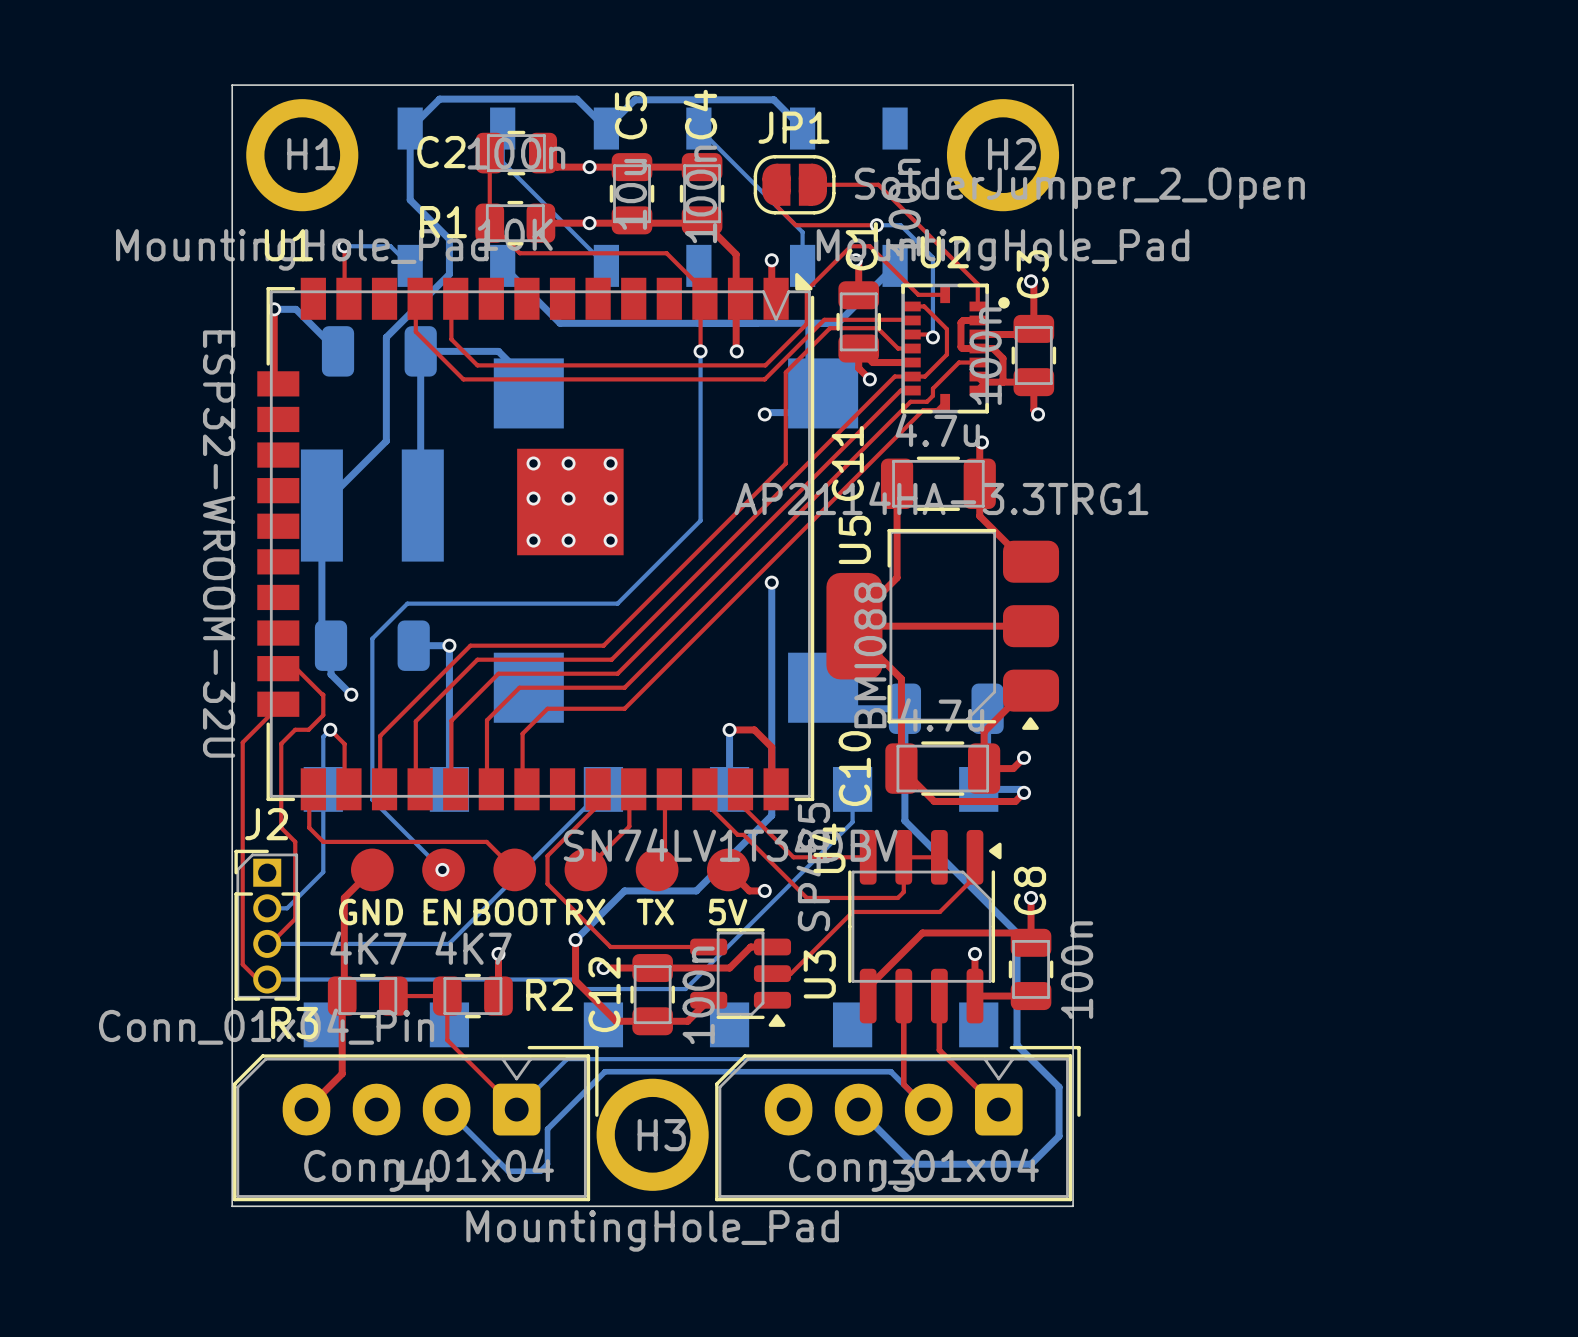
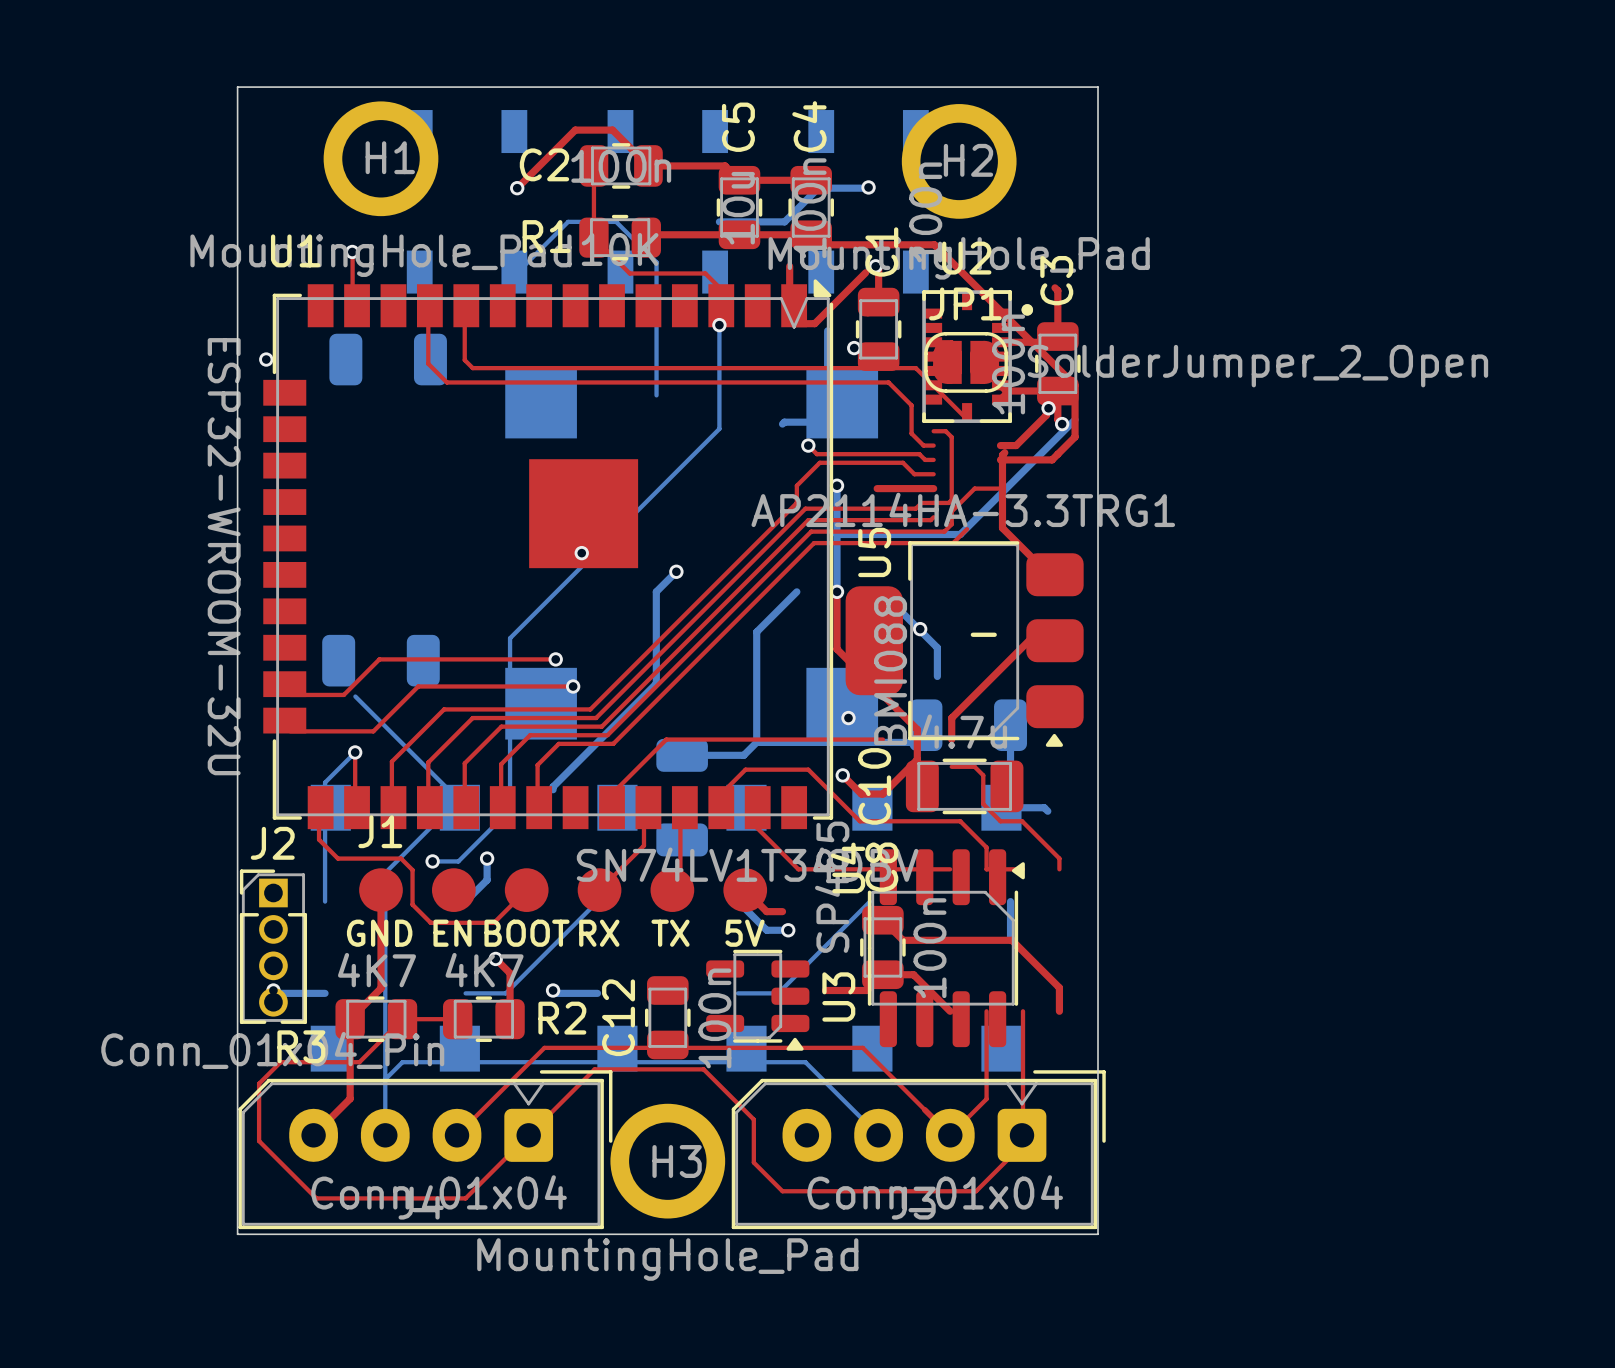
bottom track: (502, 128) (502, 162) (606, 265) -> none
bottom track: (698, 128) (802, 232) (802, 265) -> none
bottom track: (802, 128) (773, 99) (635, 99) (606, 128) (576, 99) (439, 99) (410, 128) (410, 200) (449, 239) (449, 274) (386, 337) (386, 441) (321, 505) (321, 636) (331, 645) (331, 674) (351, 694) -> none
top track: (489, 153) (489, 223) (519, 253) (666, 253) (700, 287) (700, 351) -> none
C2 position: (516, 153) -> (621, 165)
top track: (543, 153) (557, 167) (702, 167) -> none
H1 position: (302, 155) -> (380, 158)
H2 position: (1003, 155) -> (959, 161)
top track: none -> (593, 165) (593, 237) (629, 273) (705, 273) (719, 287) (719, 323)
via: (589, 167) -> none
top track: none -> (811, 180) (739, 180) (725, 165) (648, 165) (612, 130) (575, 130) (517, 188)
via: none -> (517, 188)
bottom track: none -> (868, 187) (818, 188) (784, 221) (719, 221)
top track: (776, 184) (776, 205) (795, 225) (876, 225) -> none
JP1 position: (794, 184) -> (966, 362)
top track: (812, 184) (878, 184) (977, 284) (977, 306) -> none
C5 position: (632, 193) -> (739, 207)
C4 position: (702, 193) -> (811, 207)
R1 position: (515, 223) -> (620, 237)
top track: (540, 223) (699, 223) (702, 220) (736, 254) (736, 351) -> none
via: (589, 223) -> none
bottom track: (876, 225) (900, 225) (932, 257) (932, 337) -> none
via position: (876, 225) -> (868, 187)
top track: none -> (646, 237) (649, 234) (811, 234) (821, 244) (934, 244) (1075, 385) (1075, 436) (1052, 459) (1000, 459)
bottom track: (344, 246) (390, 246) (410, 265) -> none
via: (771, 260) -> none
bottom track: (502, 265) (560, 323) (837, 323) (895, 265) -> none
bottom track: none -> (517, 272) (568, 221) (616, 221) (656, 262) (656, 395)
top track: none -> (865, 272) (814, 323) (792, 323)
via: (1031, 281) -> none
top track: (945, 294) (918, 294) (869, 246) (850, 246) (806, 290) (806, 324) (765, 365) (477, 365) (451, 339) (451, 305) -> none
top track: (415, 305) (415, 331) (463, 379) (764, 379) (824, 319) (912, 320) -> none
top track: (912, 306) (924, 306) (946, 329) (946, 354) (924, 376) (894, 376) (611, 659) (477, 659) (415, 721) (415, 782) -> none
top track: (274, 309) (274, 377) (280, 383) -> none
bottom track: (274, 309) (295, 309) (338, 351) -> none
via position: (274, 309) -> (266, 359)
top track: none -> (428, 323) (428, 363) (446, 382) (888, 382) (911, 405) (911, 433) (923, 445) (933, 445)
top track: none -> (464, 323) (464, 360) (472, 368) (915, 368) (967, 419)
bottom track: none -> (719, 325) (719, 428) (510, 638) (510, 809) (458, 861) (432, 861)
via: none -> (719, 325)
top track: (977, 320) (963, 320) (960, 322) (960, 346) (993, 348) (1003, 358) (1003, 382) -> none
via: (932, 337) -> none
via: none -> (854, 348)
top track: (912, 348) (898, 348) (877, 328) (829, 328) (785, 372) (785, 463) (603, 645) (470, 645) (380, 735) (380, 782) -> none
bottom track: (700, 351) (700, 520) (617, 603) (407, 603) (372, 638) (372, 799) (442, 869) -> none
via: (700, 351) -> none
via: (736, 351) -> none
top track: (912, 362) (872, 362) (858, 348) (858, 368) (869, 379) -> none
top track: (977, 362) (959, 362) (932, 388) (932, 395) (927, 401) (910, 401) (792, 519) -> (1000, 488) (974, 488) (951, 511) (951, 524) (944, 531) (811, 531)
via: (869, 379) -> none
top track: (912, 390) (900, 390) (617, 673) (498, 673) (451, 720) (451, 782) -> none
top track: none -> (1048, 408) (1046, 408) (1046, 415) (1016, 445) (1000, 445)
via: none -> (1048, 408)
top track: (945, 402) (937, 410) (923, 410) (624, 708) (547, 708) (522, 733) (522, 782) -> none
bottom track: none -> (1075, 419) (960, 534) (837, 534)
bottom track: (528, 412) (528, 381) (498, 351) (420, 351) (420, 503) (422, 505) -> none
via position: (764, 414) -> (808, 445)
top track: none -> (933, 431) (945, 431) (951, 437) (951, 500) (948, 502) (921, 502) (915, 508) (805, 508) (596, 718) (472, 718) (428, 762) (428, 811)
top track: none -> (808, 445) (816, 454) (919, 454) (925, 459) (933, 459)
via: (981, 442) -> none
via: (533, 463) -> none
via: (568, 463) -> none
via: (610, 463) -> none
top track: none -> (933, 474) (914, 474) (902, 462) (819, 462) (796, 485) (796, 502) (590, 709) (444, 709) (391, 761) (391, 811)
bottom track: none -> (837, 485) (837, 591)
via: none -> (837, 485)
top track: none -> (877, 488) (933, 488)
top track: (897, 483) (897, 577) (848, 626) -> none
C11 side: top (938, 483) -> bottom (682, 797)
via: (533, 498) -> none
via: (568, 498) -> none
via: (610, 498) -> none
part: (372, 505) -> none
top track: none -> (933, 517) (930, 520) (808, 520) (601, 726) (501, 726) (464, 763) (464, 811)
top track: none -> (967, 529) (953, 543) (814, 543) (613, 743) (558, 743) (537, 765) (537, 811)
via: (533, 540) -> none
via: (610, 540) -> none
bottom track: none -> (676, 571) (656, 591) (656, 683) (553, 786) (553, 789)
via: none -> (676, 571)
bottom track: none -> (796, 591) (756, 632) (756, 742)
top track: none -> (837, 591) (837, 649) (917, 729) (917, 759) (882, 794) (861, 794) (842, 775)
bottom track: none -> (881, 591) (937, 647) (937, 676)
bottom track: (771, 582) (771, 815) (696, 890) (624, 890) (575, 939) -> none
via position: (771, 582) -> (837, 591)
via: none -> (920, 629)
top track: none -> (1040, 629) (951, 718) (951, 739)
text: none -> - (983, 634)
top track: (848, 626) (901, 678) (901, 768) (934, 801) (1015, 801) (1024, 792) -> none
top track: (848, 626) (1025, 626) -> none
top track: none -> (555, 659) (379, 659) (343, 694) (290, 694)
via: none -> (555, 659)
bottom track: (413, 645) (449, 645) (449, 789) -> none
via: (449, 645) -> none
top track: (280, 668) (296, 668) (323, 694) (323, 715) (308, 729) (295, 729) (281, 743) (281, 827) (295, 841) (295, 918) (270, 943) (267, 943) -> none
top track: none -> (573, 686) (418, 686) (373, 731) (290, 731)
via: none -> (573, 686)
bottom track: none -> (355, 696) (448, 789) (468, 789) (385, 872) (385, 1135)
top track: (624, 687) (519, 687) (486, 720) (486, 782) -> (639, 703) (607, 735) (530, 735) (501, 764) (501, 811)
top track: (1025, 690) (984, 731) (984, 768) (1013, 768) (1024, 757) -> none
via: (351, 694) -> none
via: none -> (848, 718)
top track: (280, 704) (242, 742) (242, 964) (257, 979) (267, 979) -> none
bottom track: (823, 706) (824, 708) (904, 708) (904, 820) (1017, 932) (1017, 1045) (1059, 1087) (1059, 1136) (1031, 1164) (913, 1164) (858, 1109) -> (385, 1079) (402, 1062) (805, 1062) (878, 1135)
top track: none -> (882, 739) (666, 739) (610, 795) (610, 811)
bottom track: none -> (756, 742) (937, 742)
bottom track: none -> (756, 742) (743, 755) (682, 755)
top track: (330, 729) (344, 744) (344, 782) -> none
bottom track: (330, 729) (323, 736) (323, 872) (287, 908) (267, 908) -> none
via position: (330, 729) -> (355, 752)
top track: (729, 729) (754, 729) (771, 747) (771, 782) -> none
bottom track: (729, 729) (729, 789) -> none
via: (729, 729) -> none
top track: none -> (355, 752) (355, 810)
bottom track: none -> (355, 752) (325, 782) (325, 901)
top track: none -> (951, 766) (974, 766) (983, 775) (983, 804) (1000, 821) (1022, 821) (1059, 858) (1059, 869)
via: none -> (842, 775)
via: (1024, 757) -> none
top track: (593, 782) (593, 809) (547, 855) (547, 883) (610, 947) (708, 947) -> none
top track: (700, 782) (700, 797) (737, 834) (743, 834) (806, 897) (897, 897) (903, 892) (903, 857) (939, 857) -> none
top track: (736, 782) (736, 799) (793, 857) (868, 857) -> none
bottom track: (603, 789) (448, 943) (267, 943) -> none
bottom track: (852, 789) (852, 822) (685, 989) (582, 989) (573, 979) (267, 979) -> none
top track: none -> (719, 811) (719, 795) (745, 769) (808, 769) (859, 821) (960, 821) (986, 847) (986, 869) (1023, 869)
top track: none -> (756, 811) (756, 827) (798, 869) (950, 869)
via: (1024, 792) -> none
top track: (309, 797) (309, 827) (323, 841) (486, 841) (514, 869) -> (319, 811) (319, 839) (337, 858) (401, 858) (412, 870) (412, 904) (430, 922) (494, 922) (526, 890)
J1 name: none -> J1 (380, 831)
bottom track: none -> (487, 858) (487, 880) (465, 901)
via: none -> (487, 858)
via: none -> (432, 861)
top track: (974, 857) (974, 876) (939, 911) (852, 911) (791, 973) (772, 973) -> none
top track: (372, 869) (344, 897) (344, 993) -> (380, 890) (380, 988) (352, 1017)
via: (442, 869) -> none
bottom track: none -> (597, 901) (505, 993) (465, 993)
bottom track: none -> (738, 901) (766, 930) (788, 930)
bottom track: none -> (869, 901) (778, 993) (738, 993)
bottom track: none -> (1010, 901) (1011, 940)
via position: (764, 890) -> (788, 930)
top track: (1031, 897) (1031, 942) (1021, 932) (922, 932) (868, 987) (868, 996) -> none
via: (1031, 897) -> none
top track: none -> (882, 920) (902, 940) (1011, 940) (1059, 987) (1059, 1011)
top track: none -> (495, 958) (510, 973) (510, 976)
via: none -> (495, 958)
top track: (575, 939) (575, 980) (616, 1021) (687, 1021) (708, 1000) -> none
via: (575, 939) -> none
top track: (772, 947) (750, 947) (729, 968) (603, 968) -> none
via: (498, 954) -> none
top track: (974, 954) (974, 996) (1010, 996) -> none
via: (974, 954) -> none
bottom track: none -> (273, 990) (276, 993) (325, 993)
via: none -> (273, 990)
bottom track: none -> (553, 990) (555, 993) (597, 993)
via: none -> (553, 990)
via: (603, 968) -> none
top track: none -> (825, 990) (867, 990) (882, 974) (913, 974) (950, 1011)
C8 position: (1031, 969) -> (882, 947)
top track: none -> (986, 1011) (986, 1099) (950, 1135)
top track: none -> (1023, 1011) (1023, 1134)
top track: (447, 996) (447, 1040) (516, 1109) -> none
top track: (903, 996) (903, 1084) -> (456, 1135) (544, 1047) (862, 1047) (924, 1109)
top track: (939, 996) (939, 1050) (998, 1109) -> (402, 1019) (359, 1062) (280, 1062) (259, 1083) (259, 1141) (316, 1198) (465, 1198) (594, 1069) (703, 1069) (753, 1119) (753, 1162) (782, 1191) (976, 1191) (1022, 1145) (1022, 1135)
bottom track: (446, 1109) (508, 1171) (540, 1171) (547, 1164) (547, 1129) (604, 1071) (890, 1071) (928, 1109) -> none
bottom track: (516, 1109) (567, 1059) (948, 1059) (998, 1109) -> none

